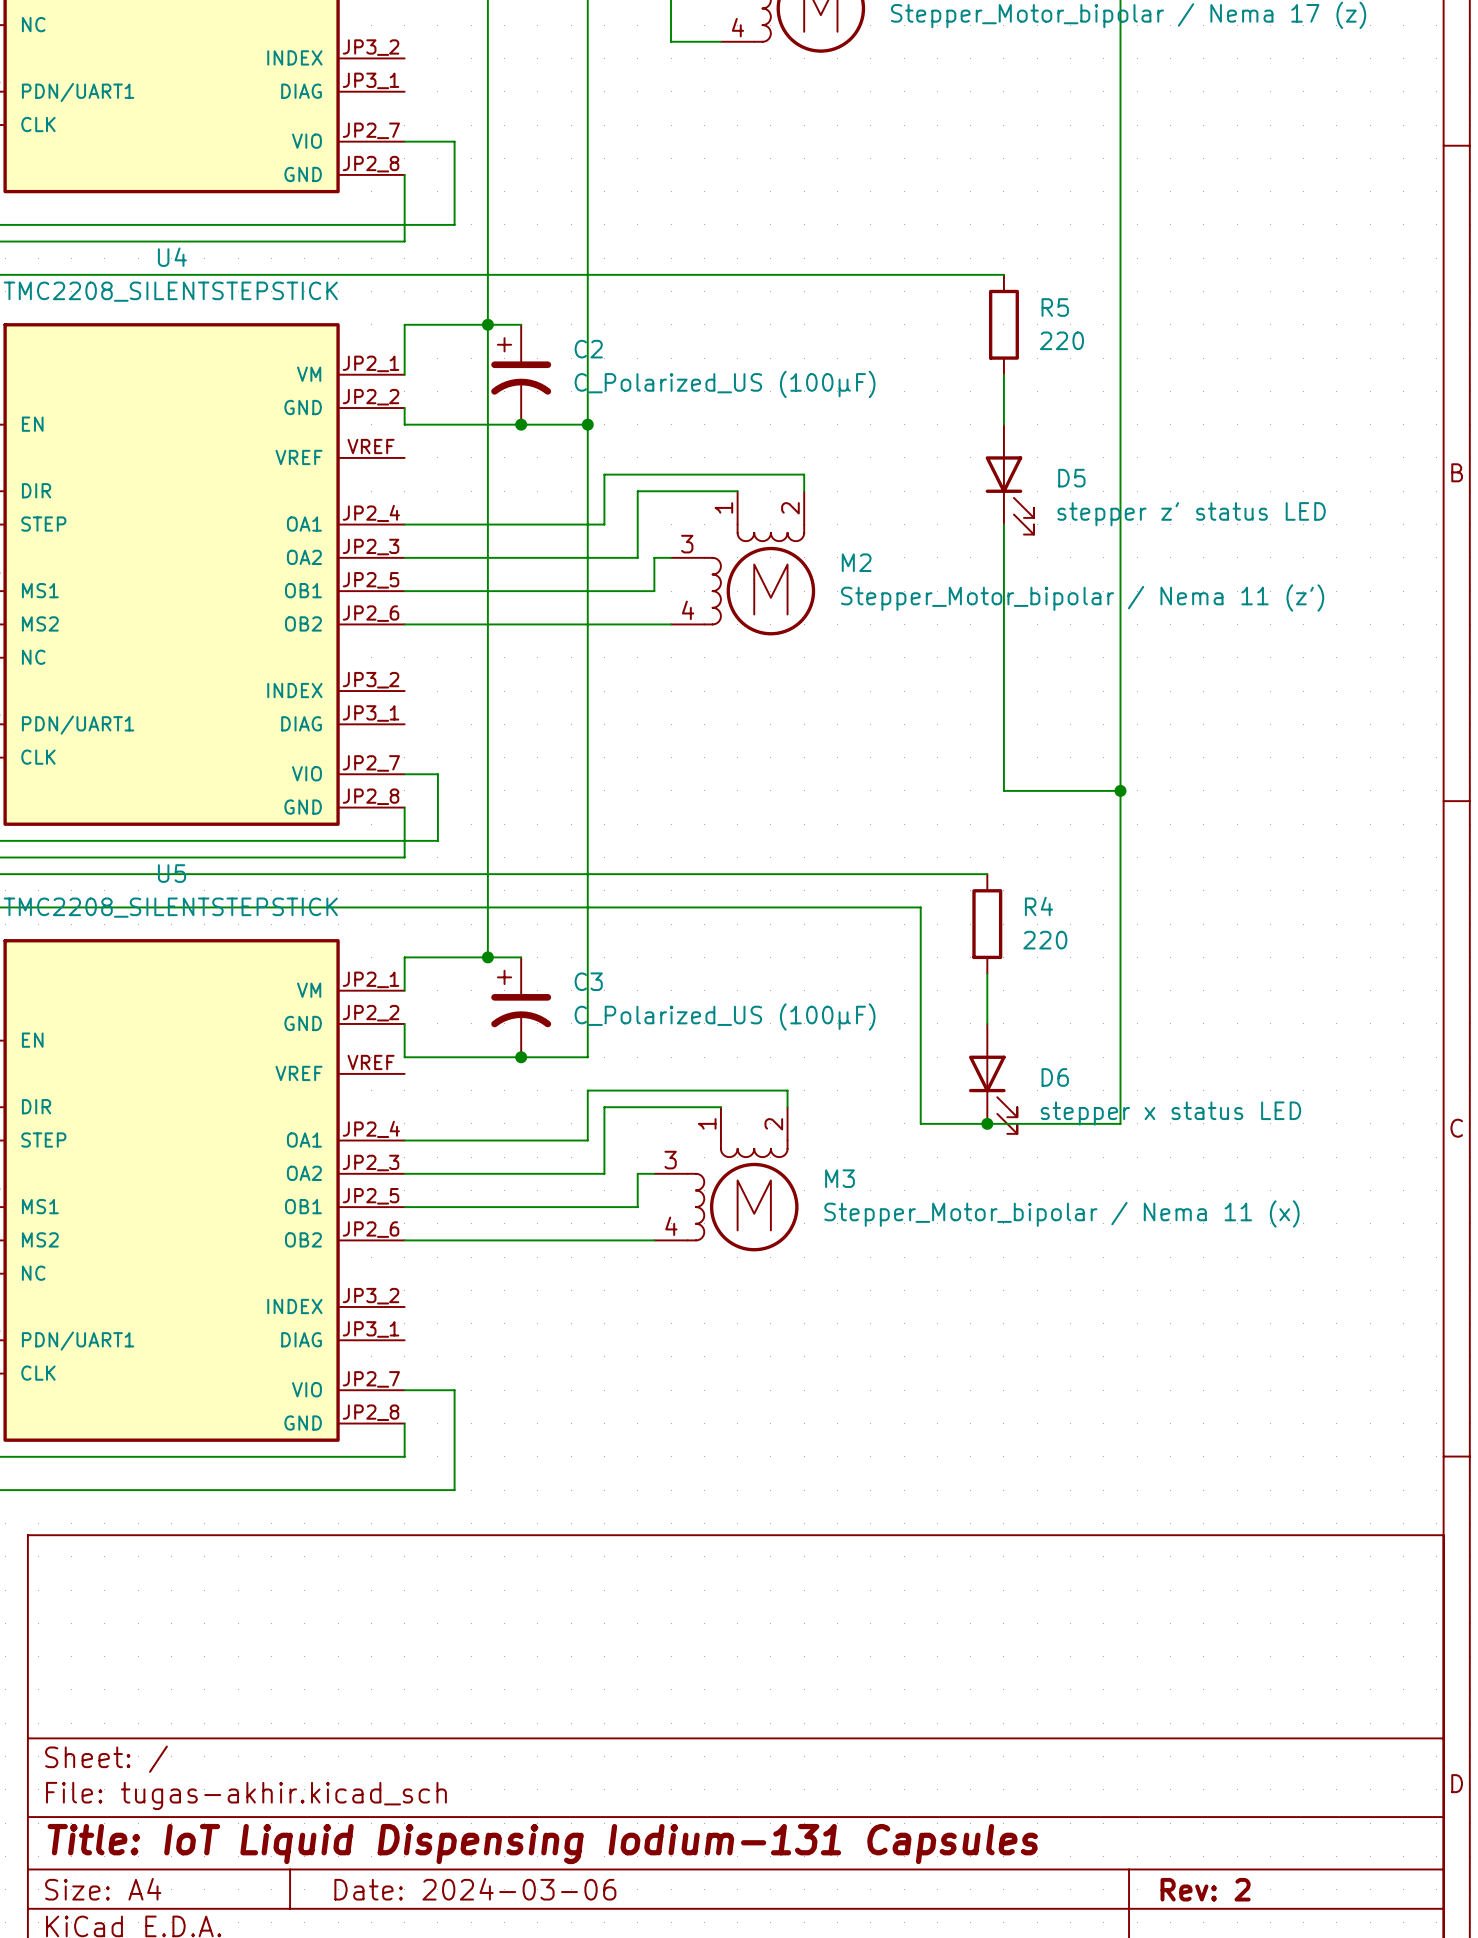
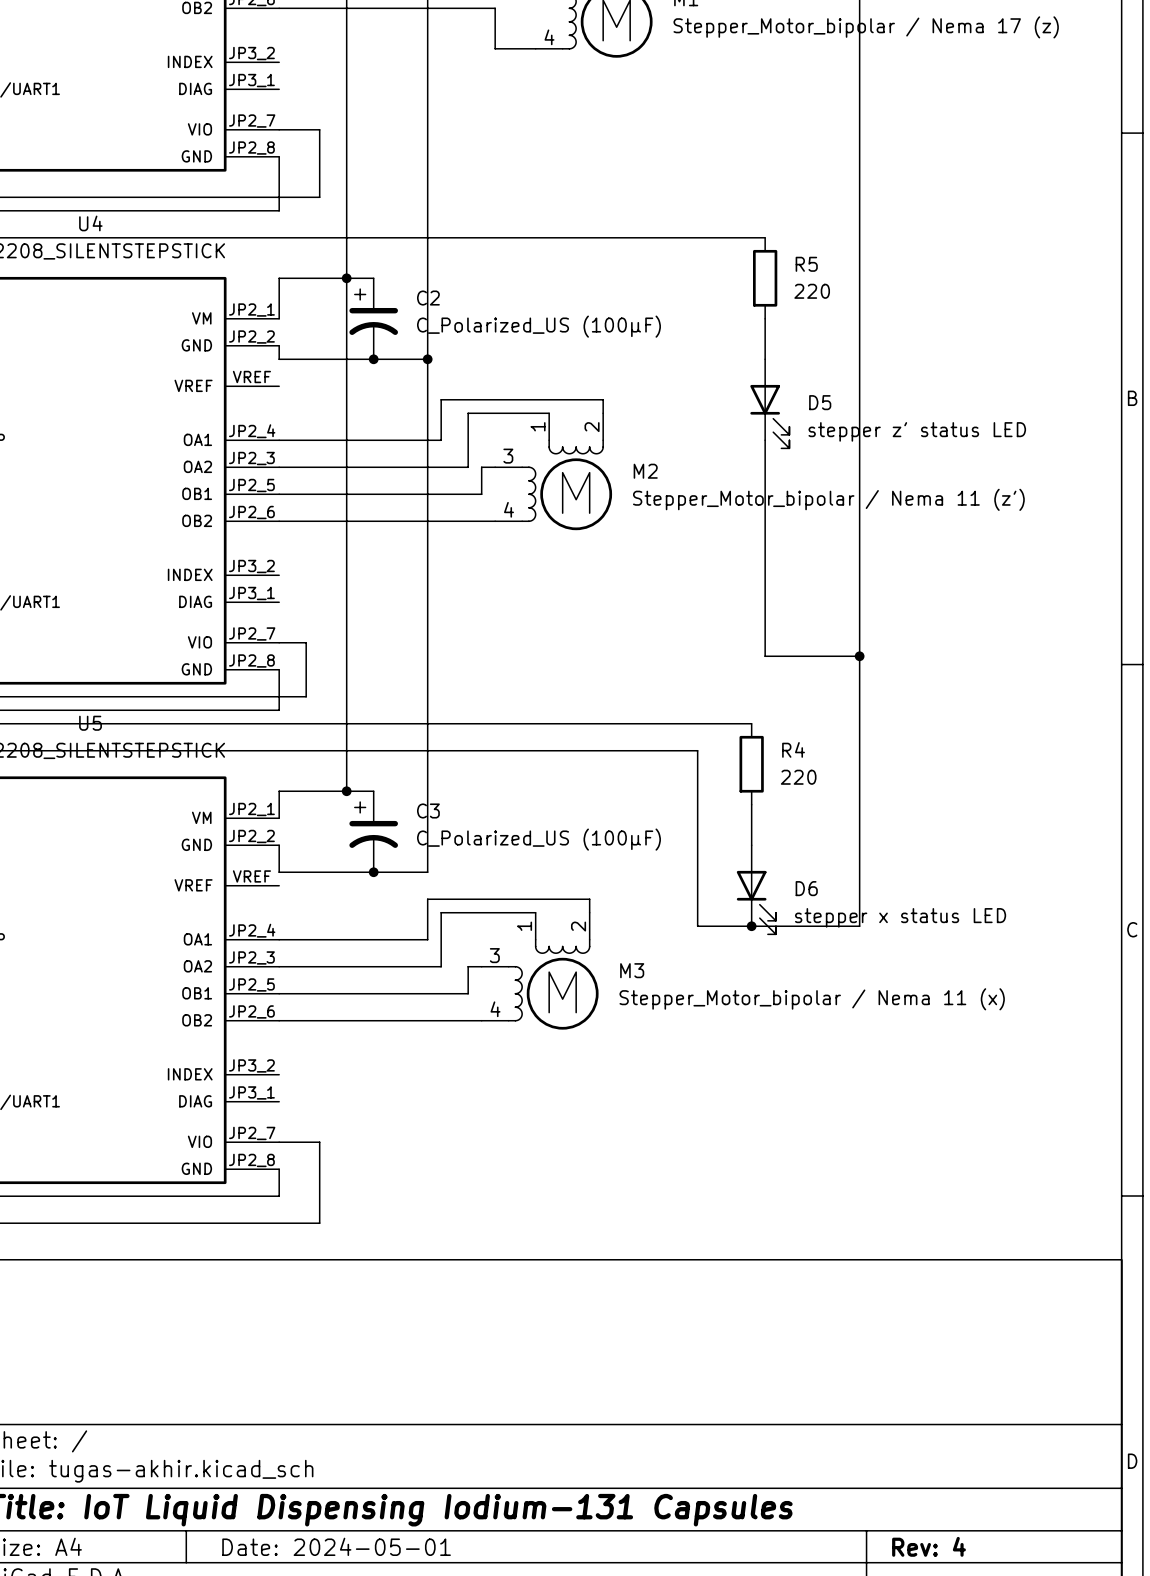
title block: Date: 2024-03-06 (475, 1889) -> Date: 2024-05-01 (336, 1546)
title block: Rev: 2 (1205, 1889) -> Rev: 4 (929, 1546)

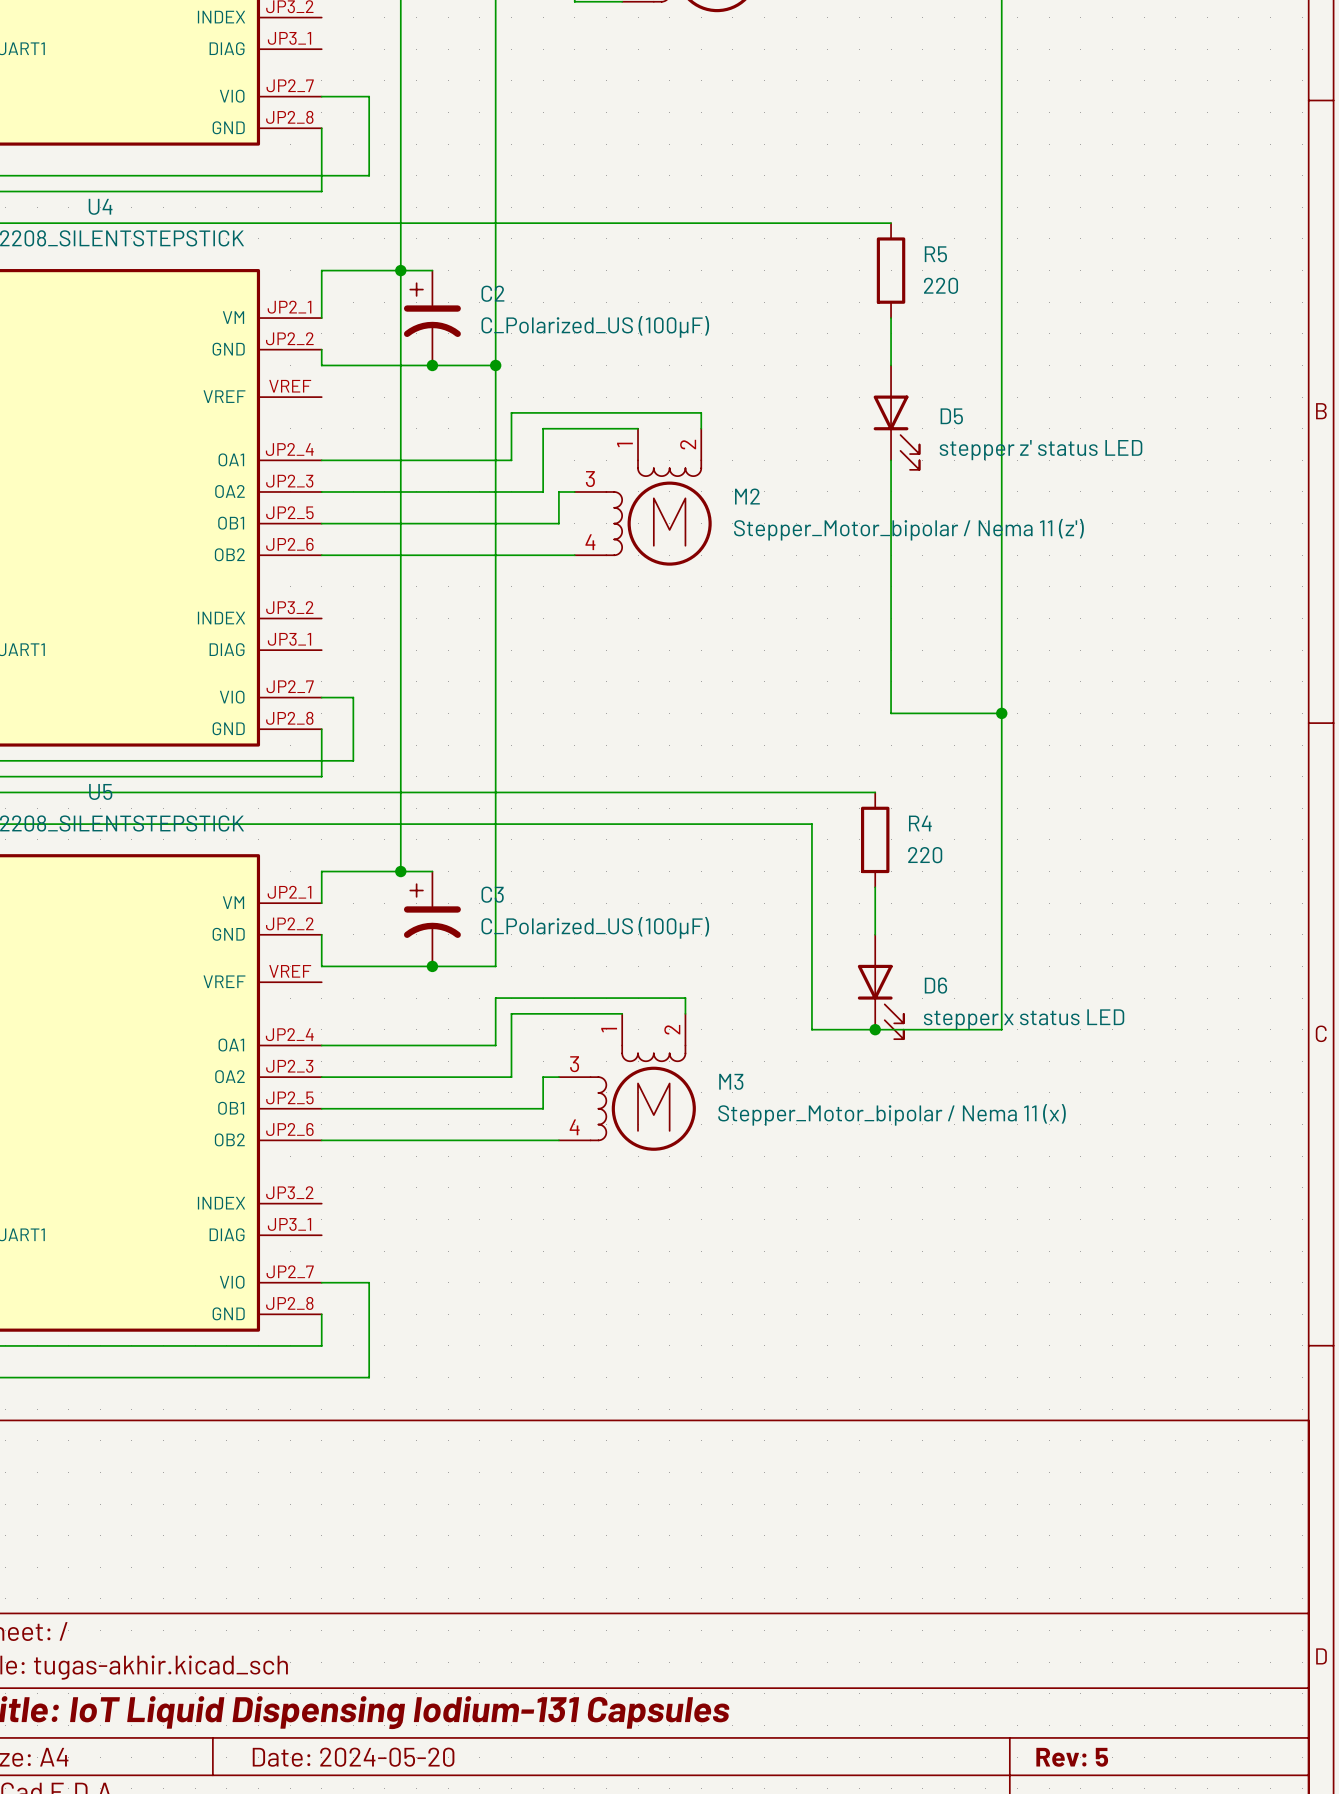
title block: Date: 2024-05-01 (336, 1546) -> Date: 2024-05-20 (353, 1757)
title block: Rev: 4 (929, 1546) -> Rev: 5 (1072, 1757)

